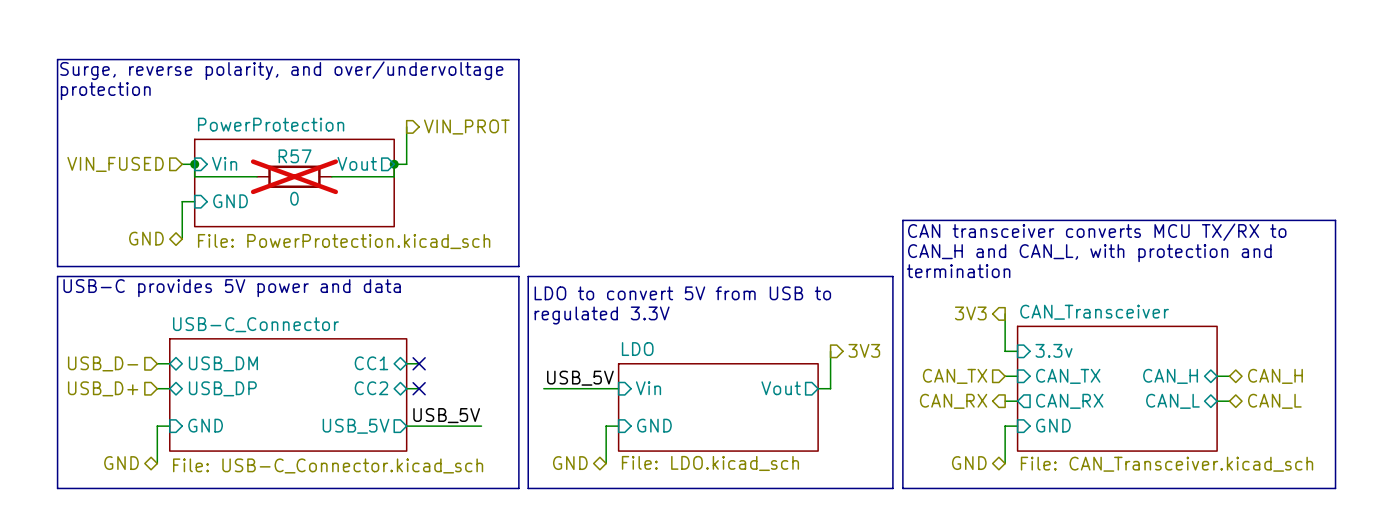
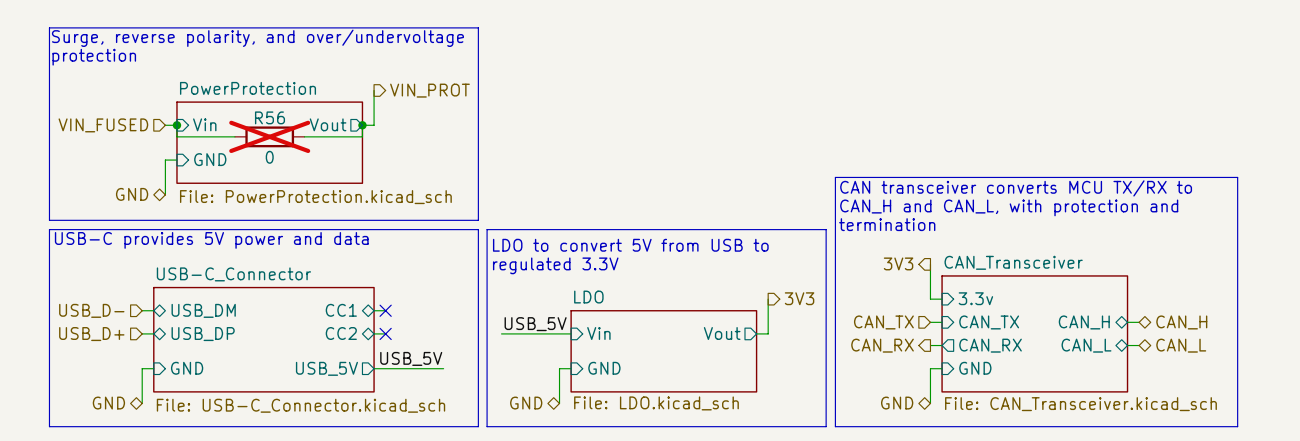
R57 name: R57 (295, 156) -> R56 (269, 117)

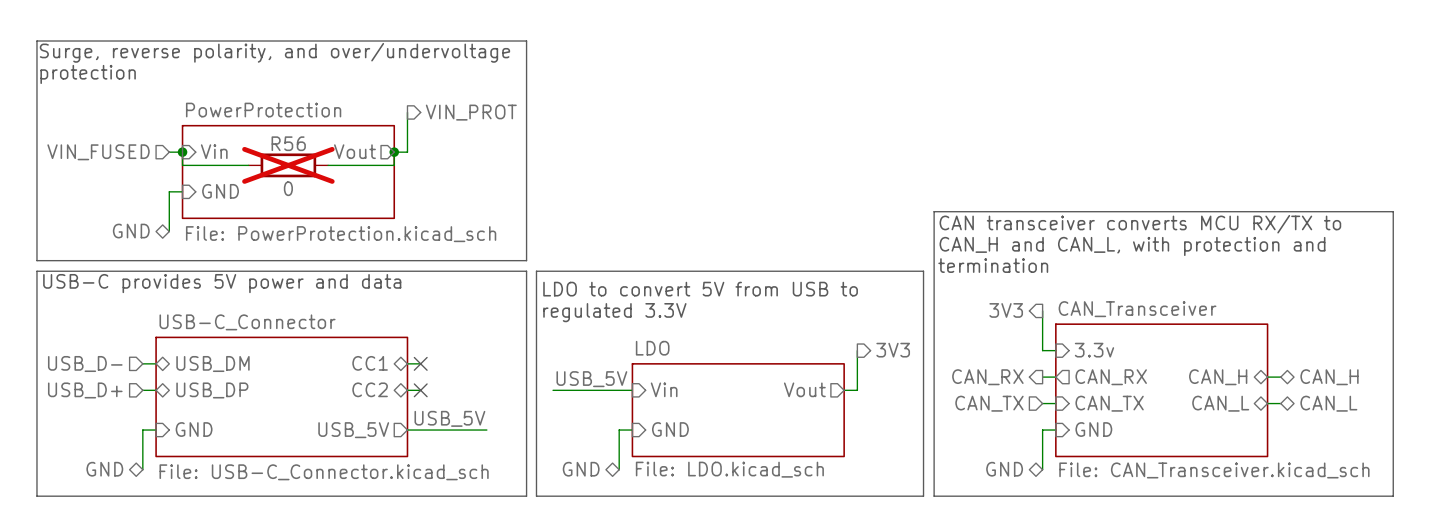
text: CAN transceiver converts MCU TX/RX to (1016, 188) -> CAN transceiver converts MCU RX/TX to (1140, 224)
hierarchical label shape: input (883, 322) -> output (987, 377)
hierarchical label: CAN_TX (883, 322) -> CAN_RX (987, 377)
sheet pin shape: input (989, 322) -> output (1111, 377)
sheet pin: CAN_TX (989, 322) -> CAN_RX (1111, 377)
hierarchical label shape: output (882, 345) -> input (989, 403)
hierarchical label: CAN_RX (882, 345) -> CAN_TX (989, 403)
sheet pin shape: output (990, 345) -> input (1109, 403)
sheet pin: CAN_RX (990, 345) -> CAN_TX (1109, 403)

